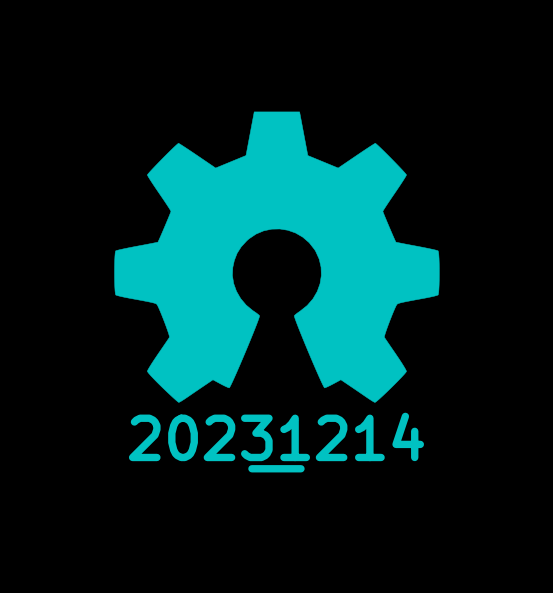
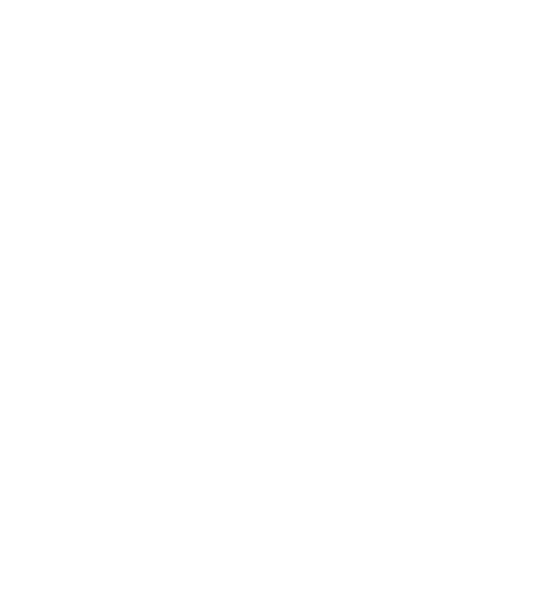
drawing: [114, 111, 440, 473] -> none

